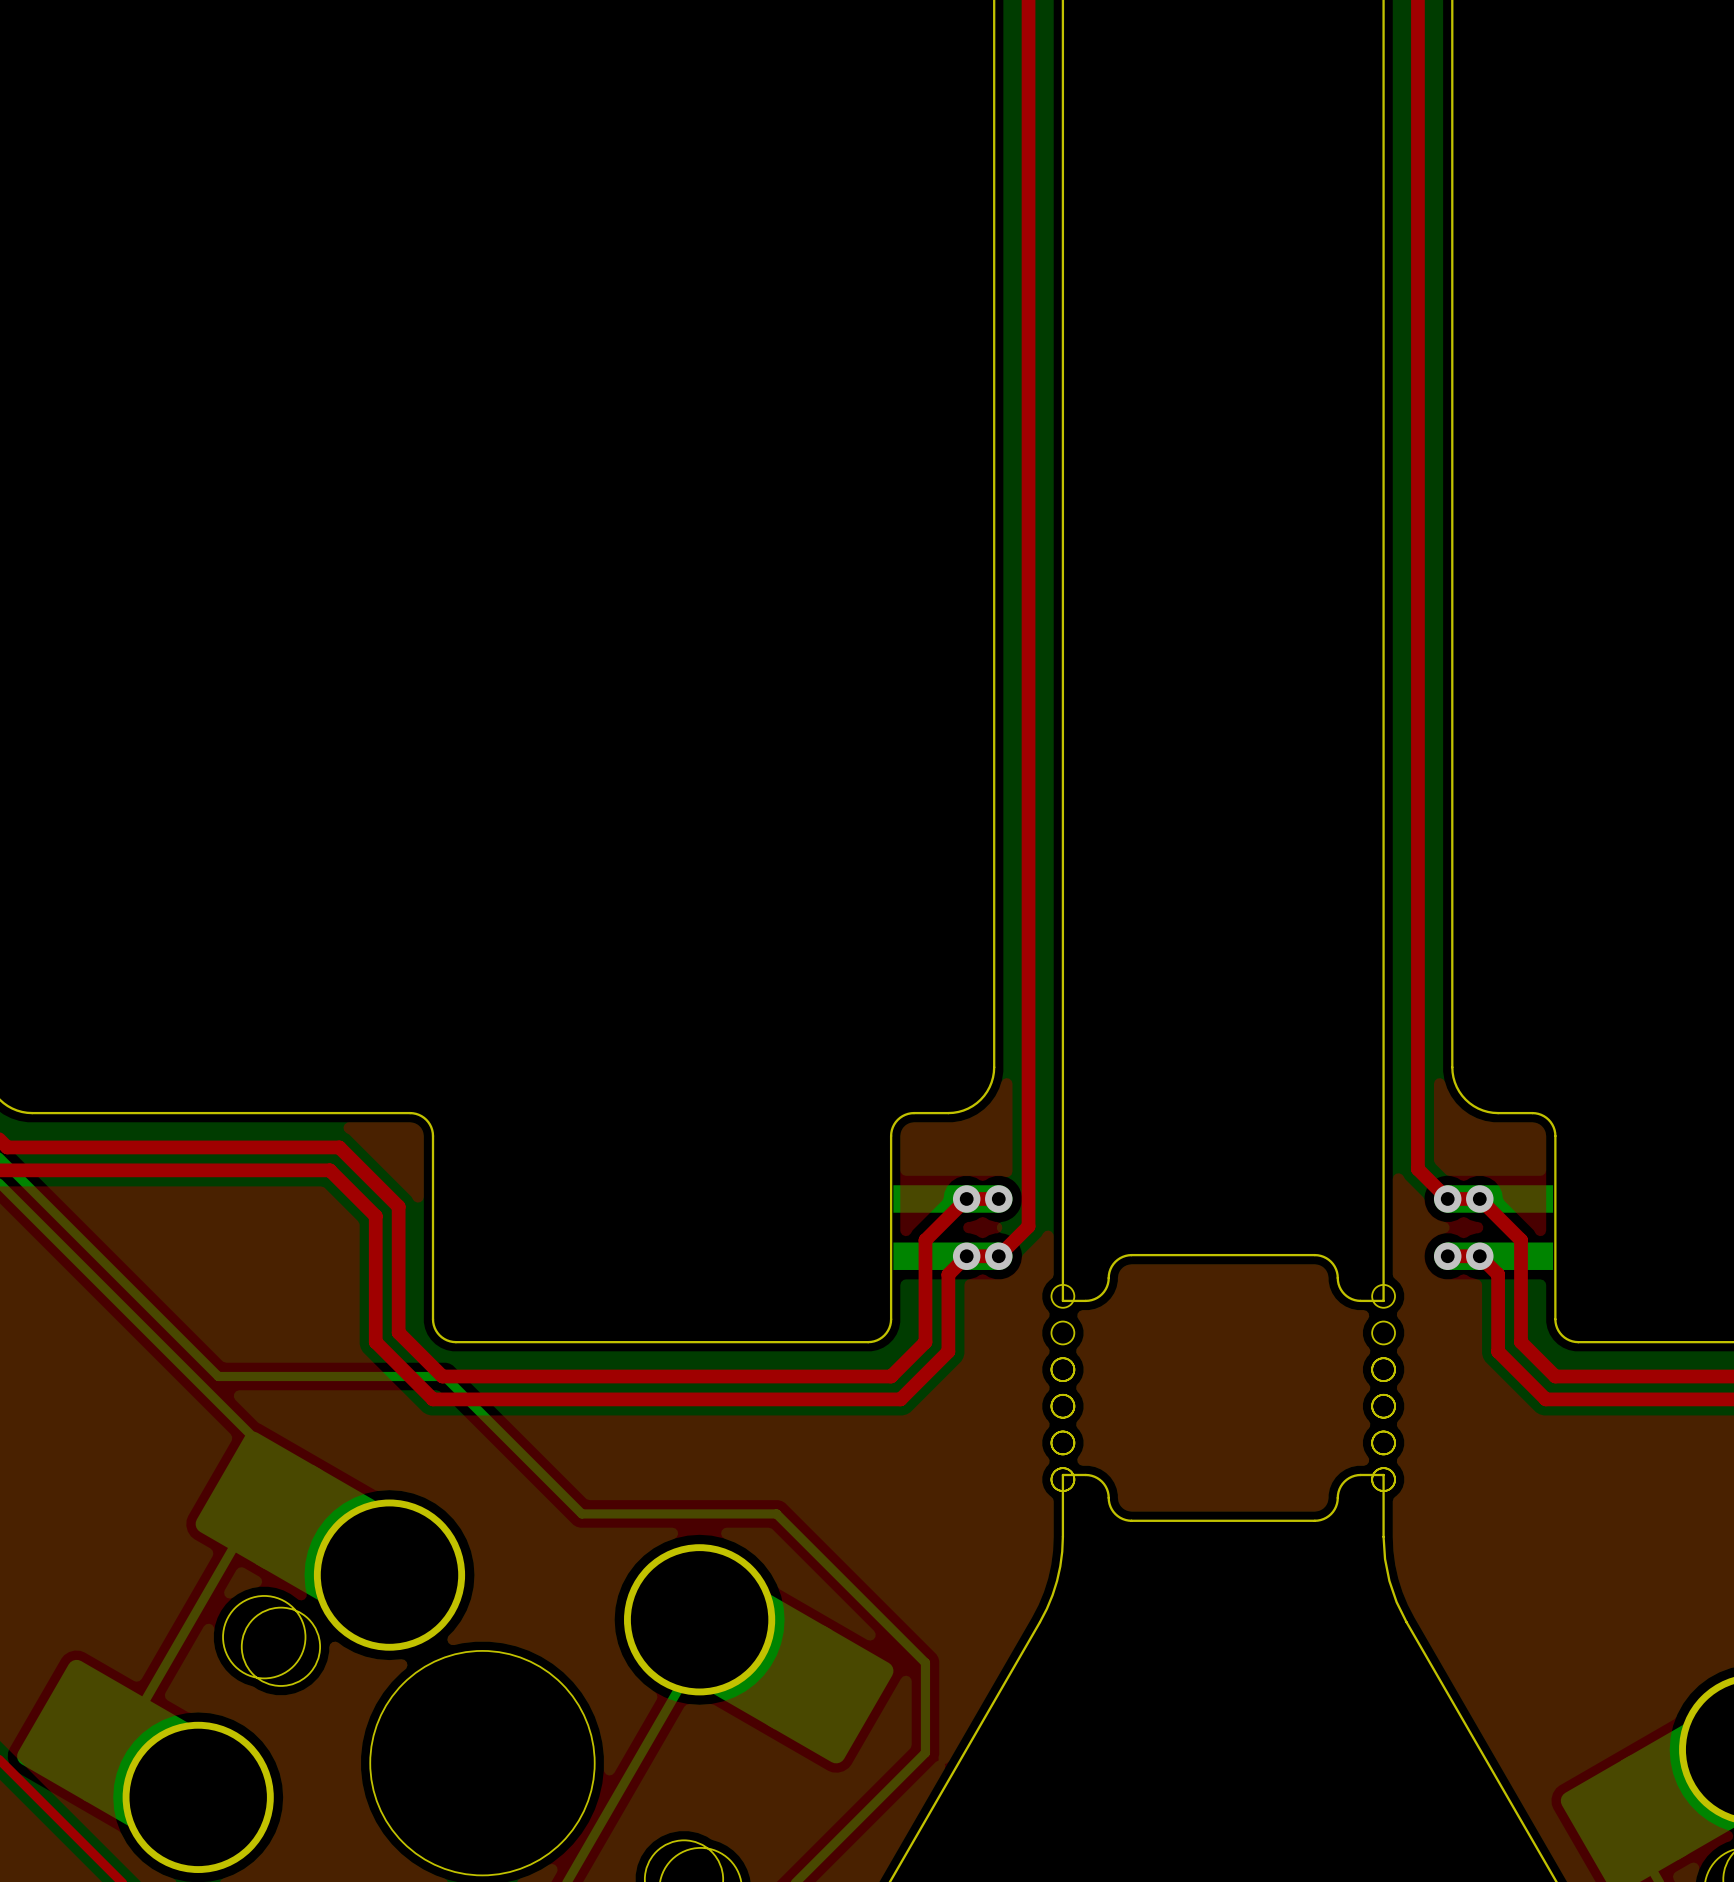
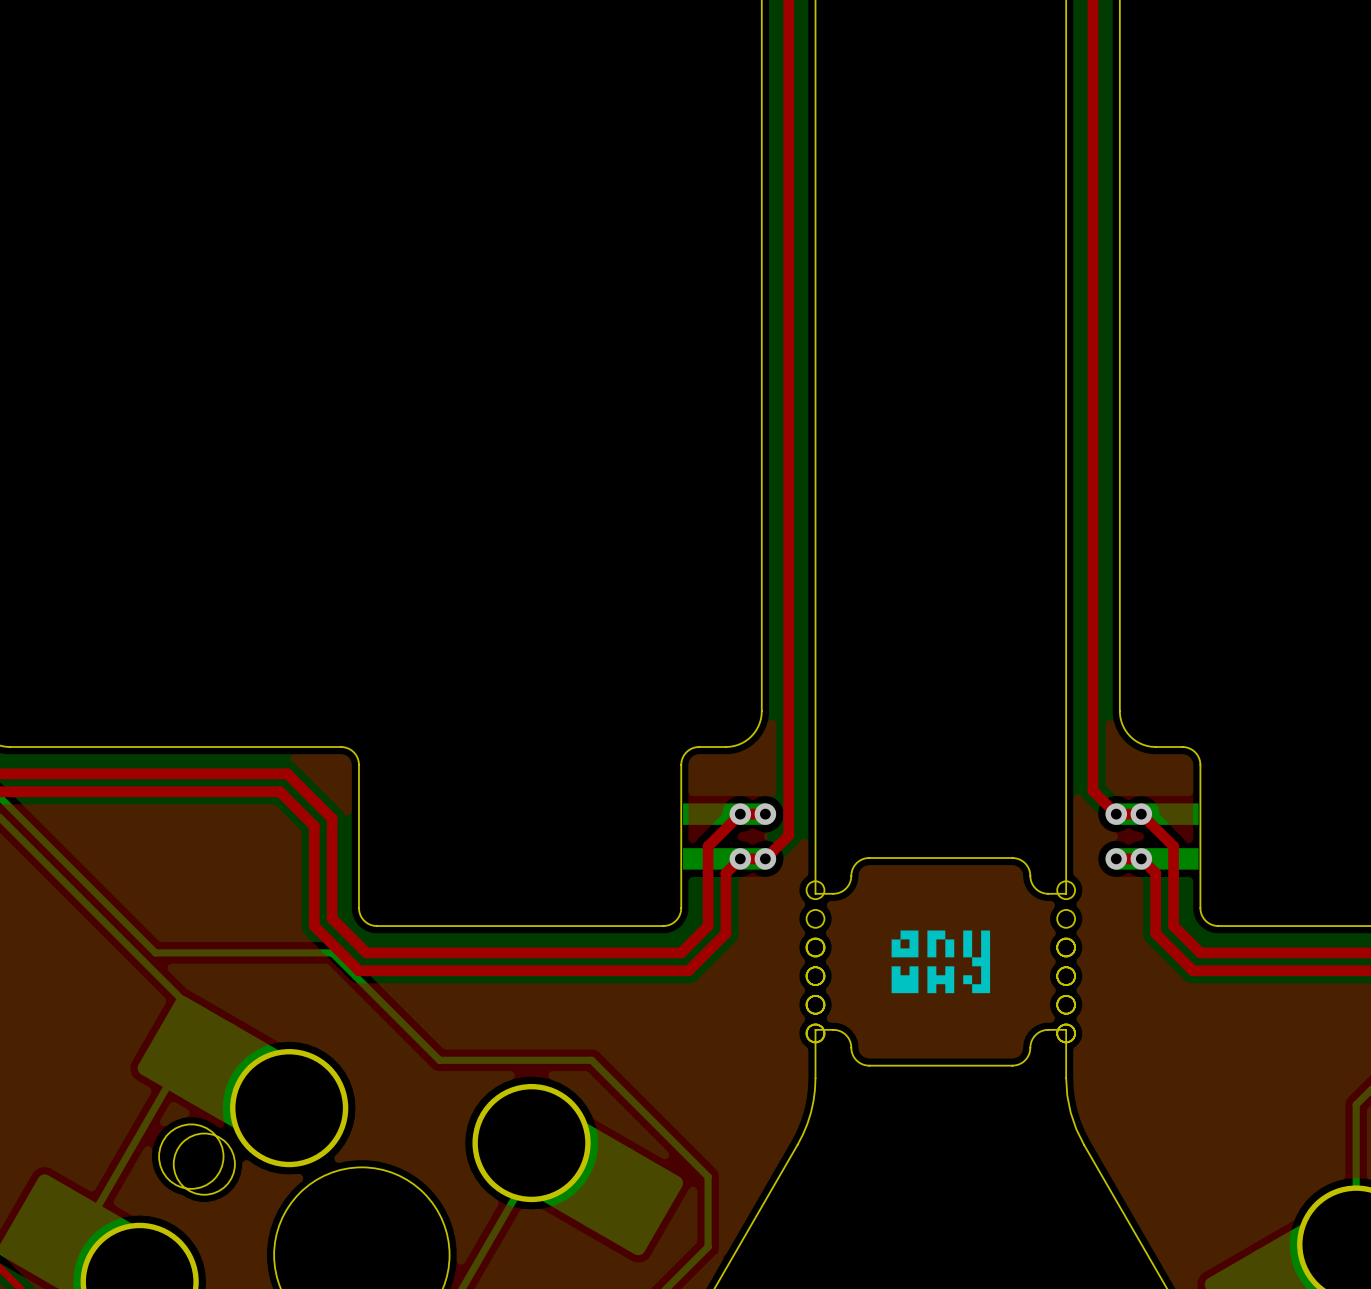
board edge: (410, 1113) (418, 1114) (426, 1119) (432, 1133) (433, 1319) (434, 1328) (439, 1335) (449, 1341) (501, 1342) -> (305, 747) (345, 747) (351, 750) (357, 758) (359, 910) (365, 922) (376, 926)
top track: (339, 1147) (398, 1206) (398, 1332) (442, 1376) (488, 1376) -> (250, 773) (287, 773) (332, 818) (332, 918) (366, 952)
top track: (329, 1170) (375, 1216) (375, 1342) (433, 1399) (478, 1399) -> (242, 791) (279, 791) (314, 826) (314, 926) (358, 970)
drawing: none -> [891, 930, 991, 994]

